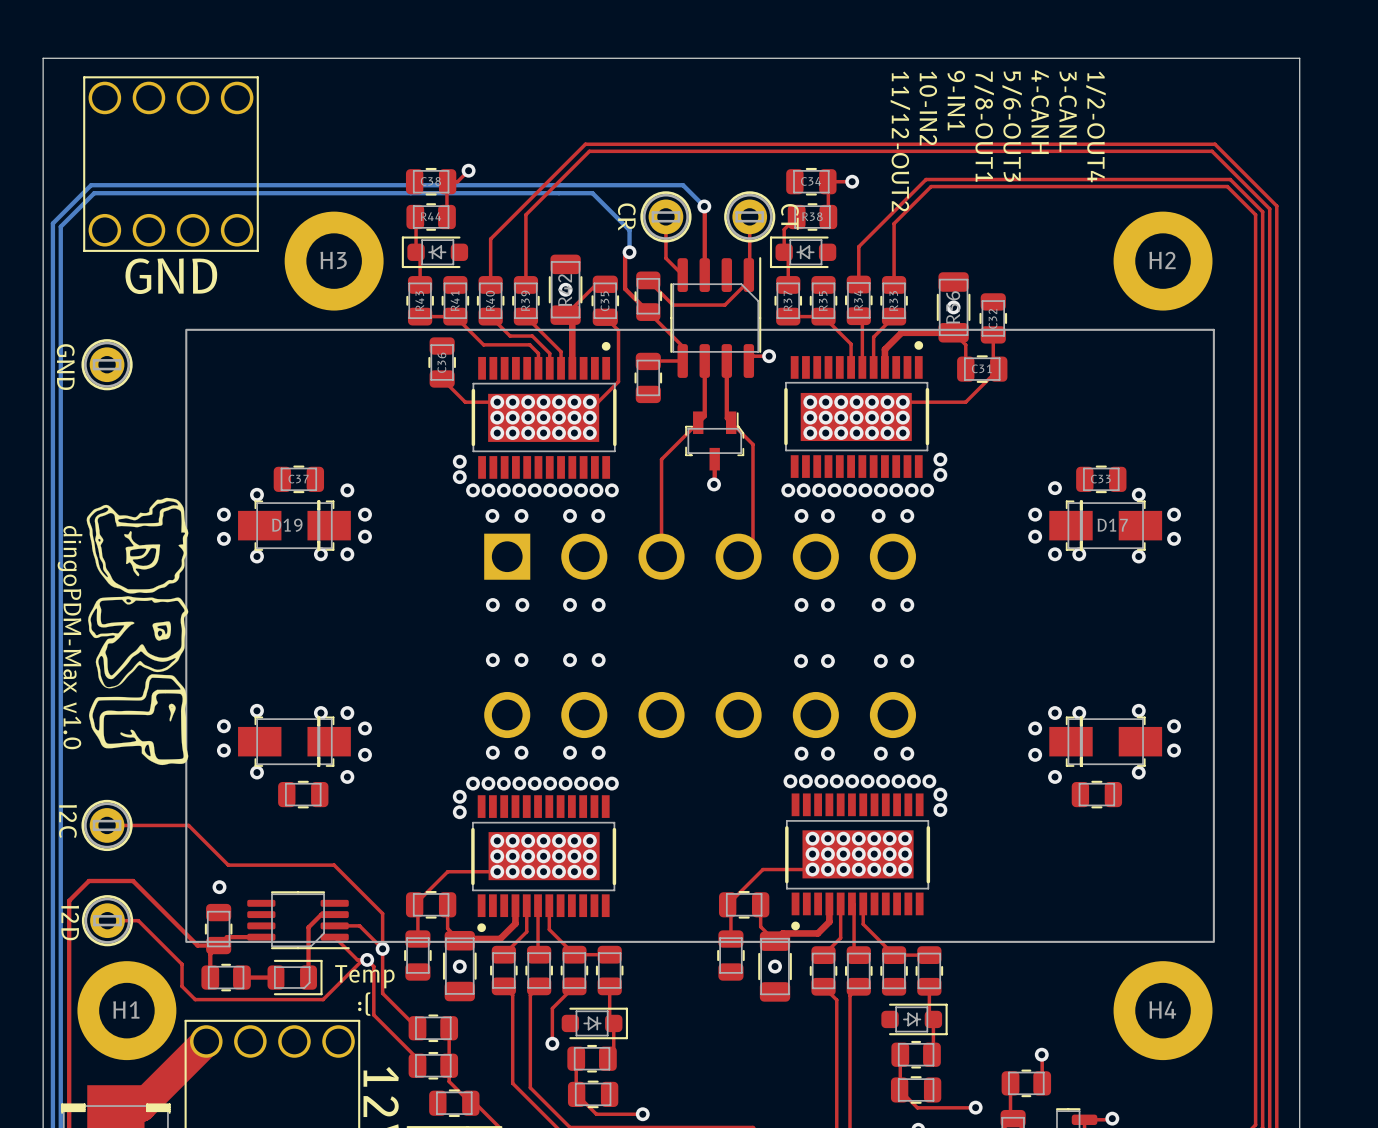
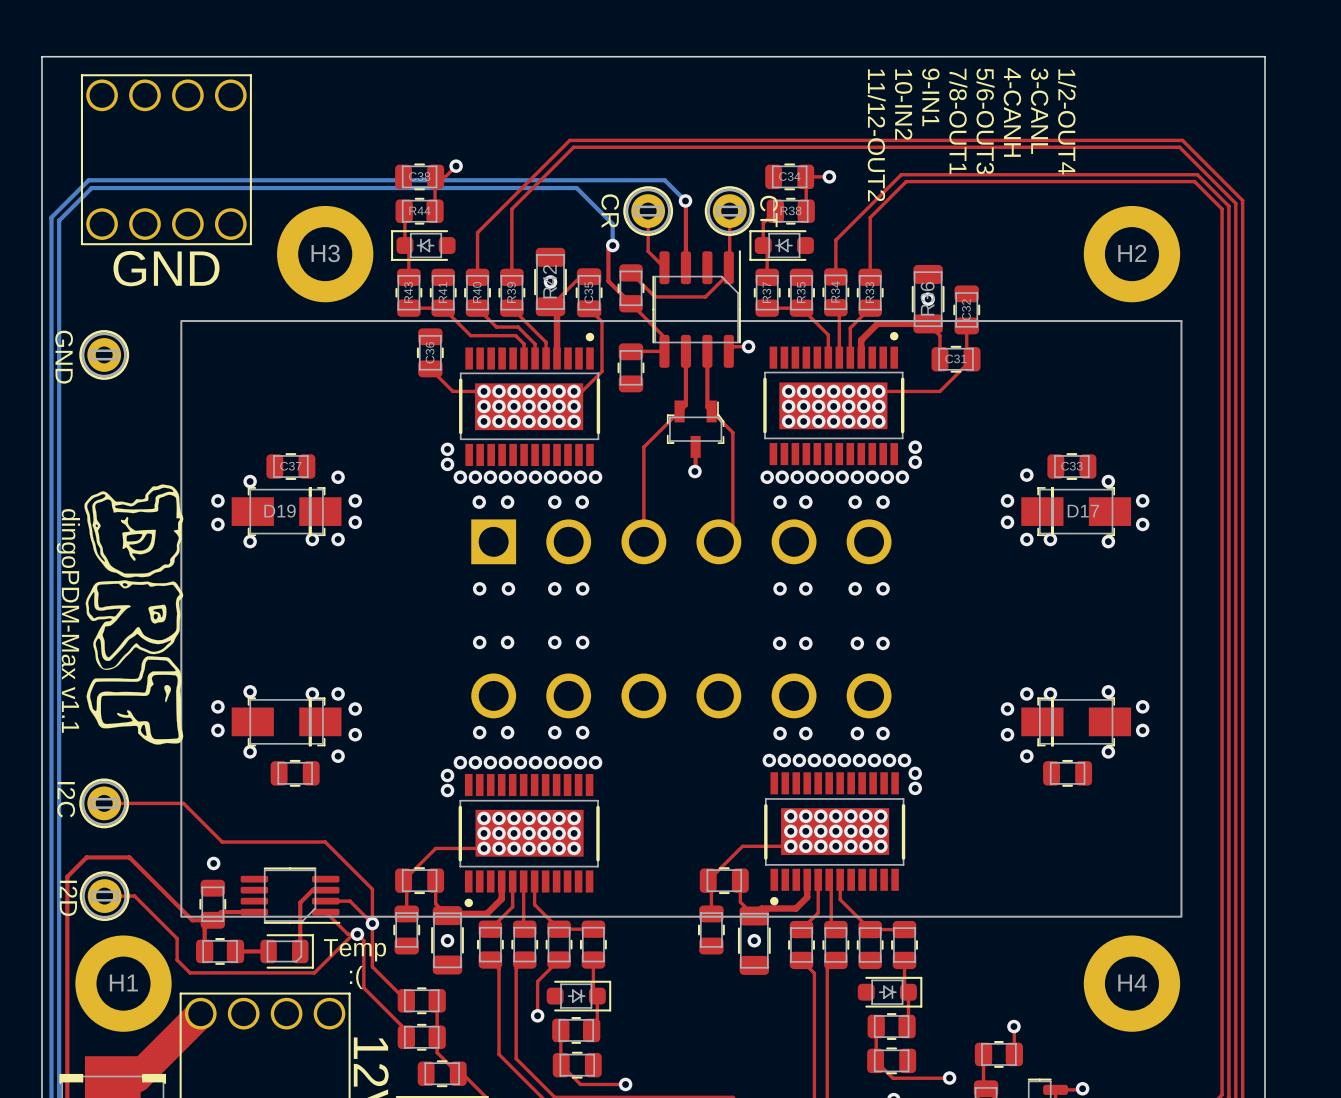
text: dingoPDM-Max v1.0 (70, 637) -> dingoPDM-Max v1.1 (68, 620)

